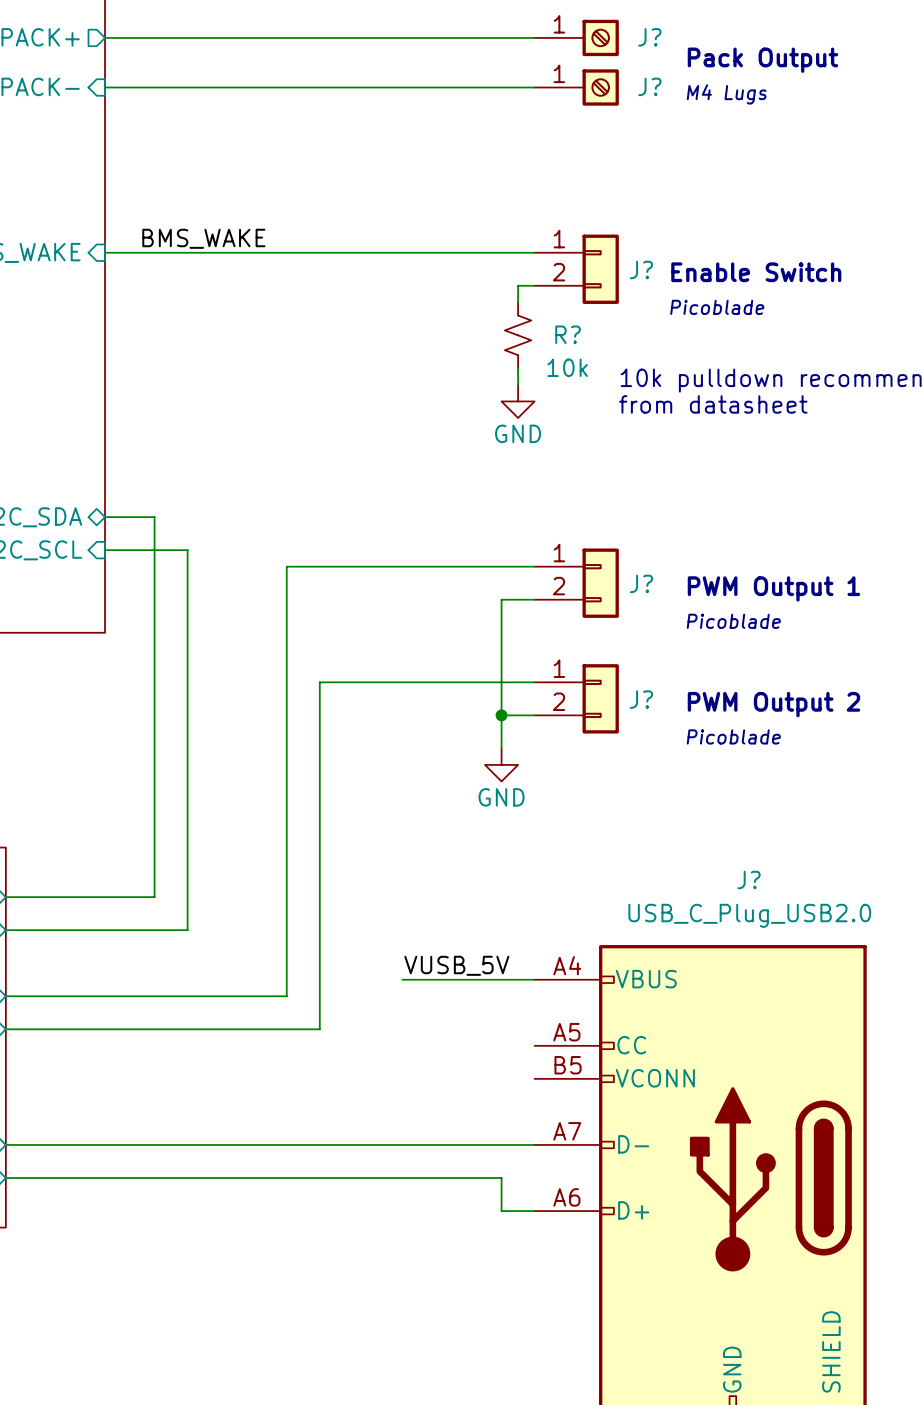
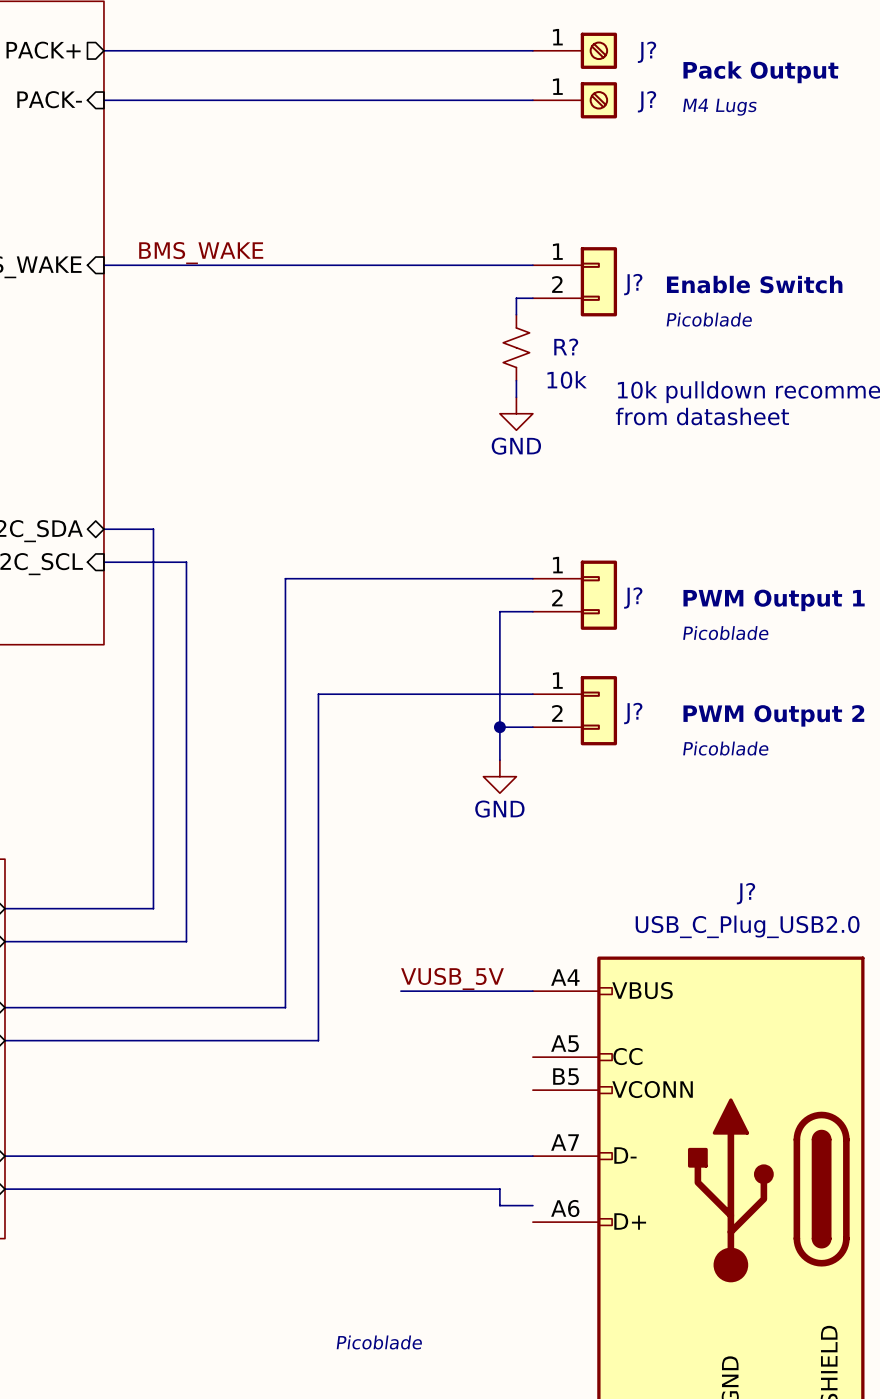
wire: (501, 1194) (501, 1211) (534, 1211) -> (499, 1205) (532, 1205)
text: none -> Picoblade (379, 1342)

